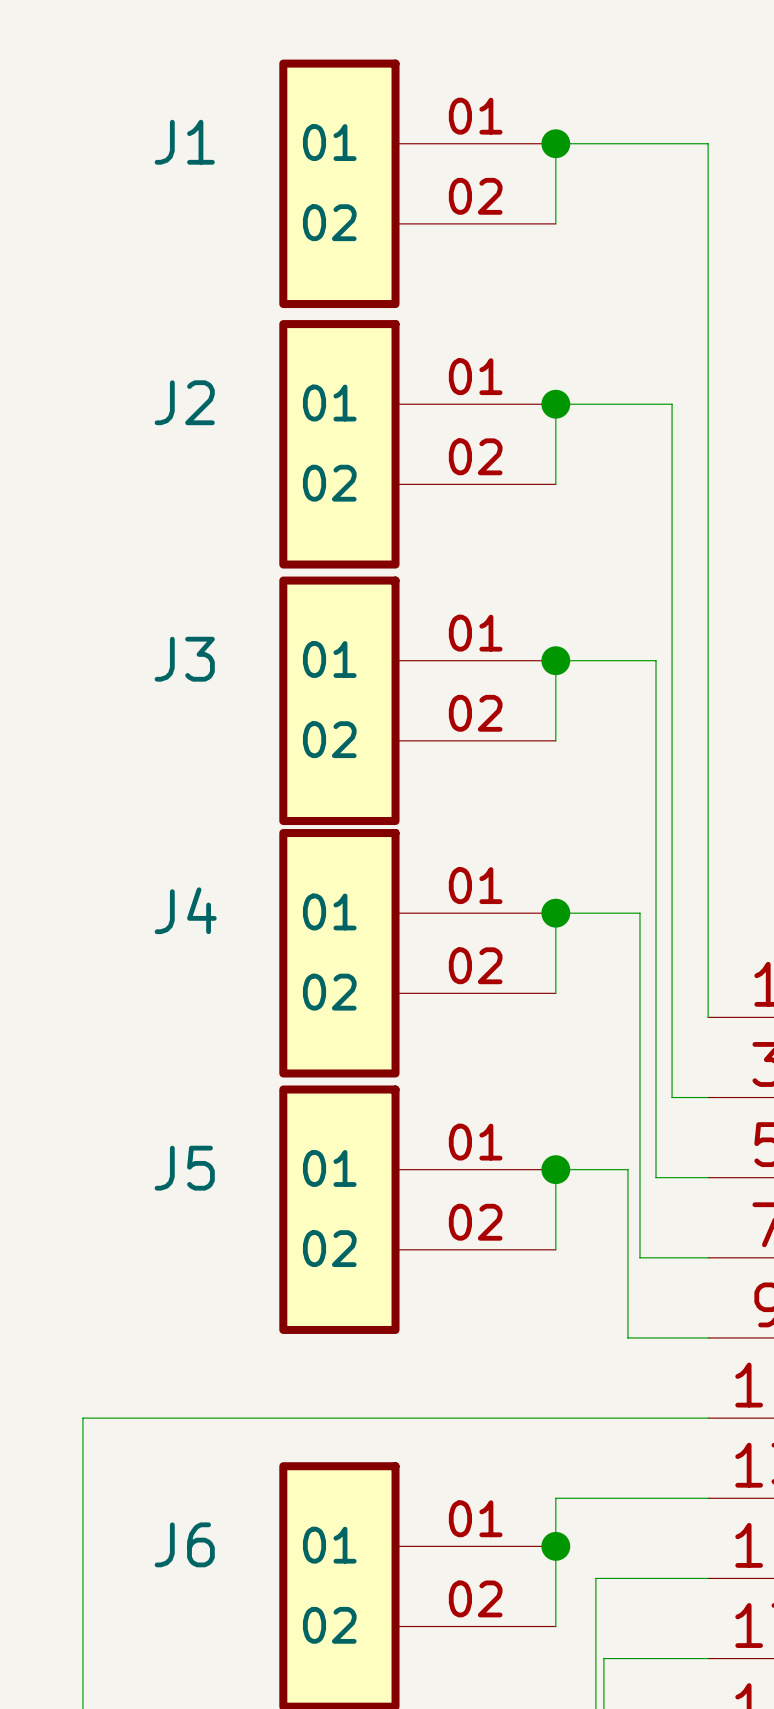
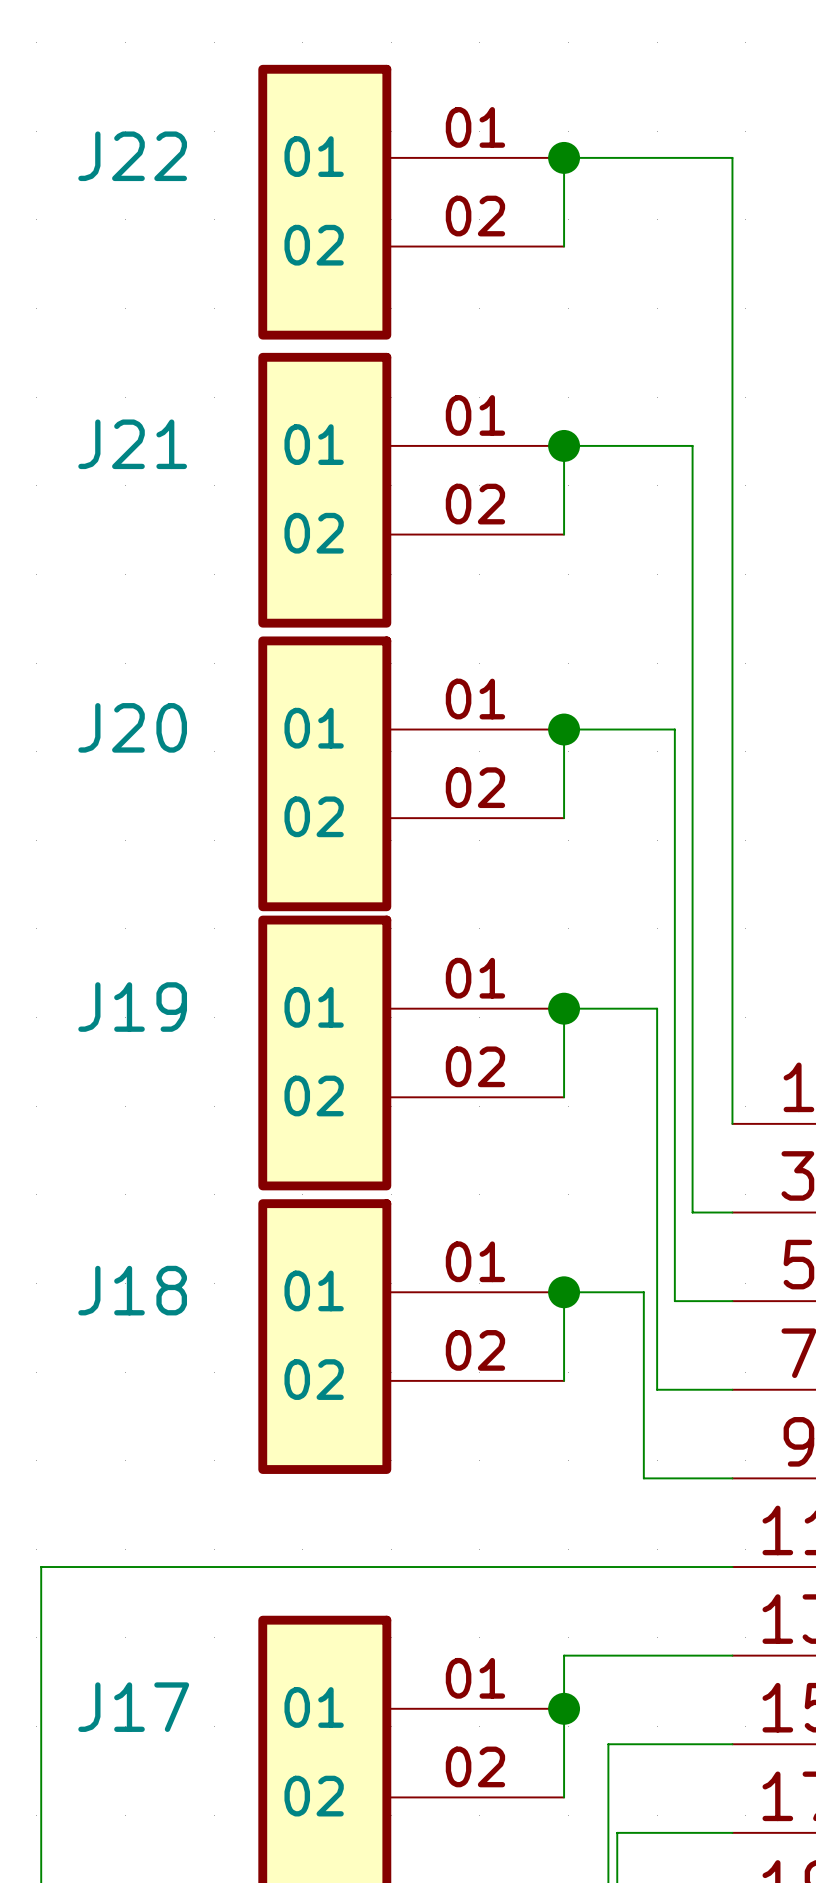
J1 name: J1 (184, 142) -> J22 (132, 156)
J2 name: J2 (184, 402) -> J21 (132, 444)
J3 name: J3 (184, 659) -> J20 (132, 727)
J4 name: J4 (185, 910) -> J19 (132, 1007)
J5 name: J5 (184, 1168) -> J18 (132, 1290)
J6 name: J6 (184, 1544) -> J17 (133, 1707)

